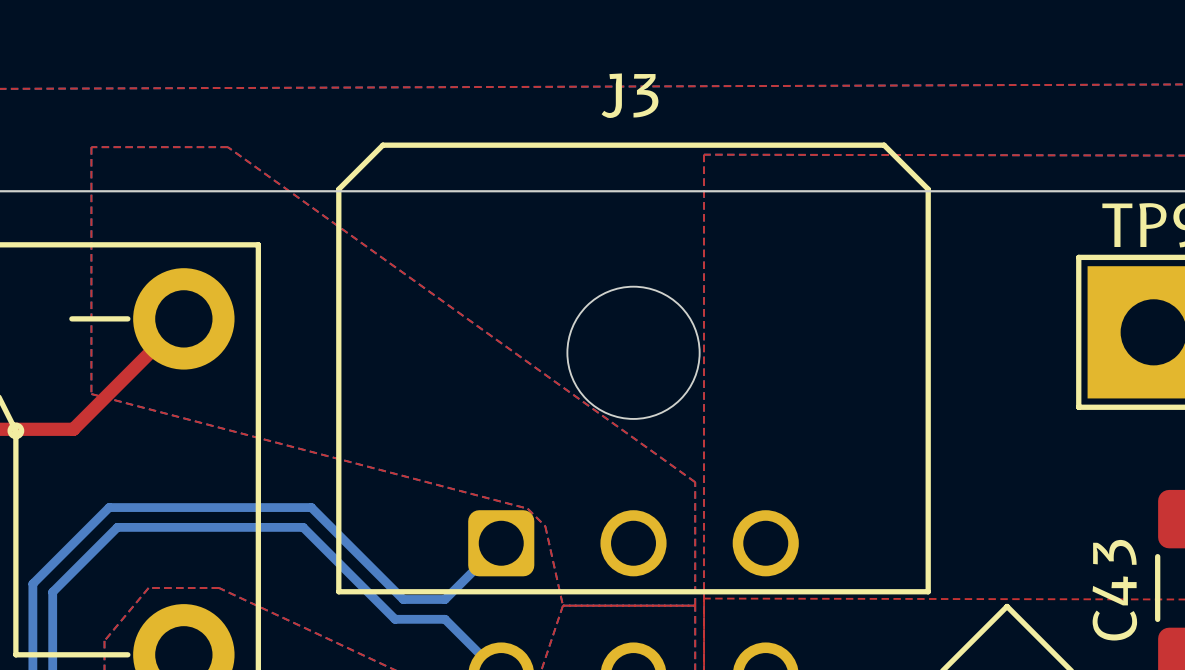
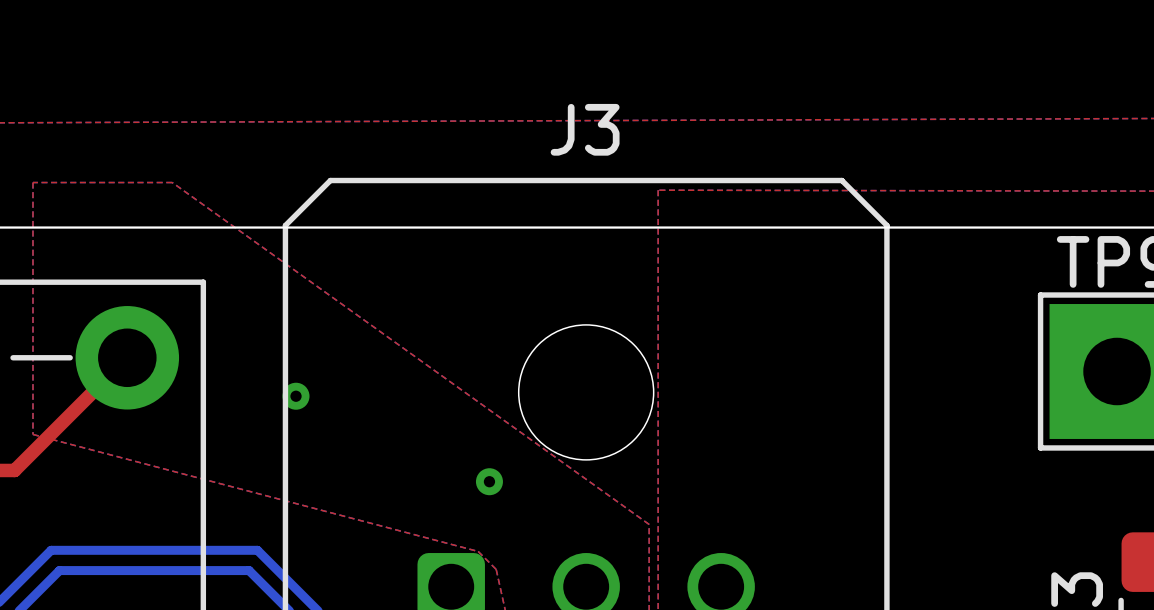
via: none -> (296, 396)
via: none -> (489, 481)

